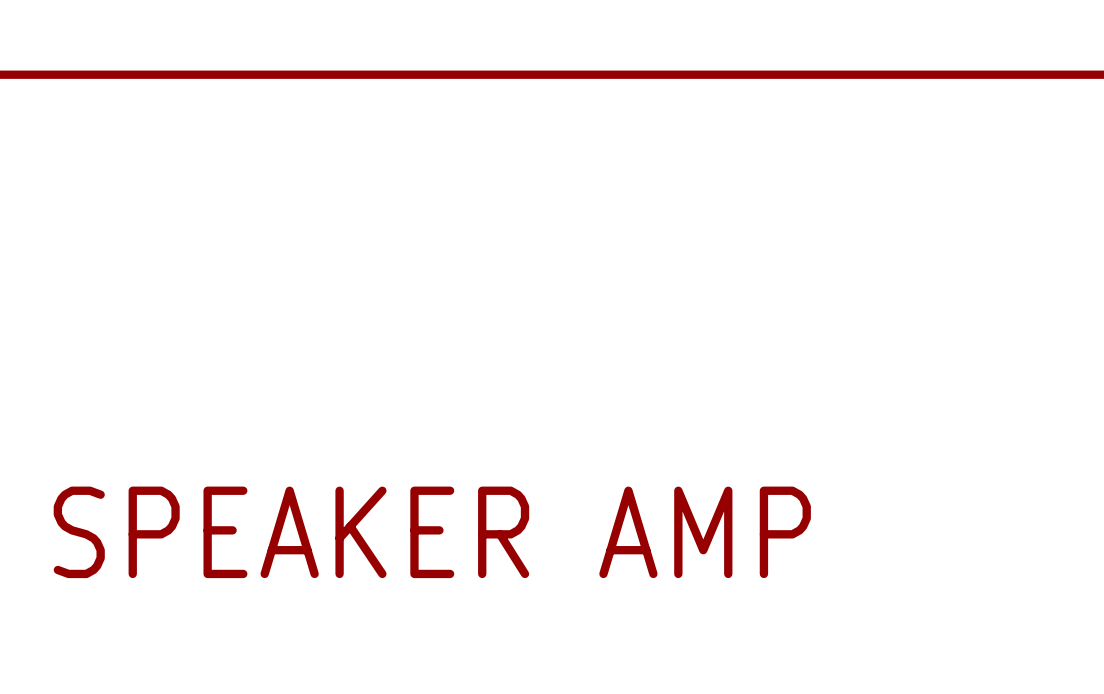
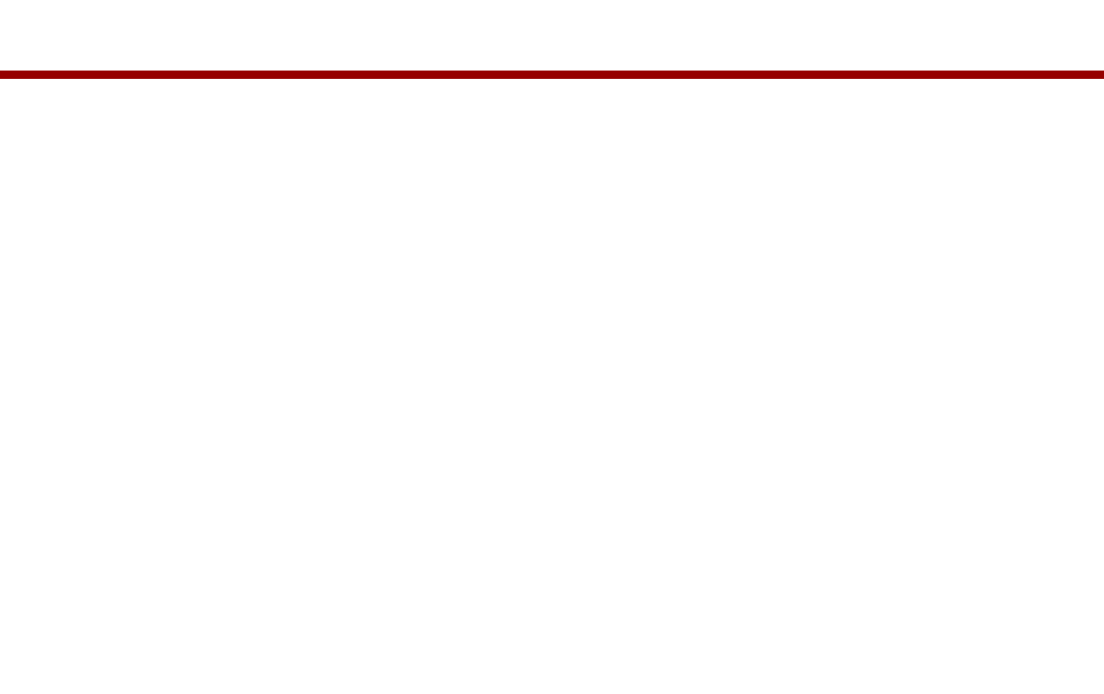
text: SPEAKER AMP (432, 532) -> none

